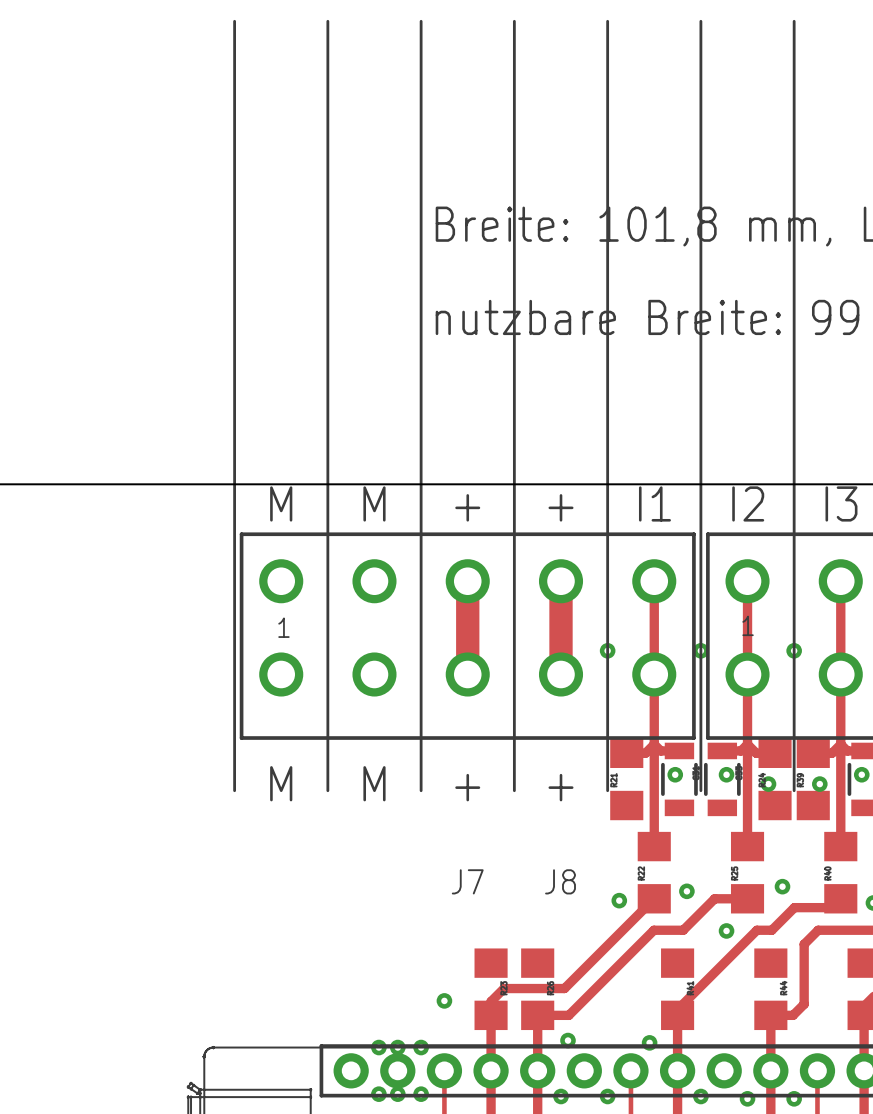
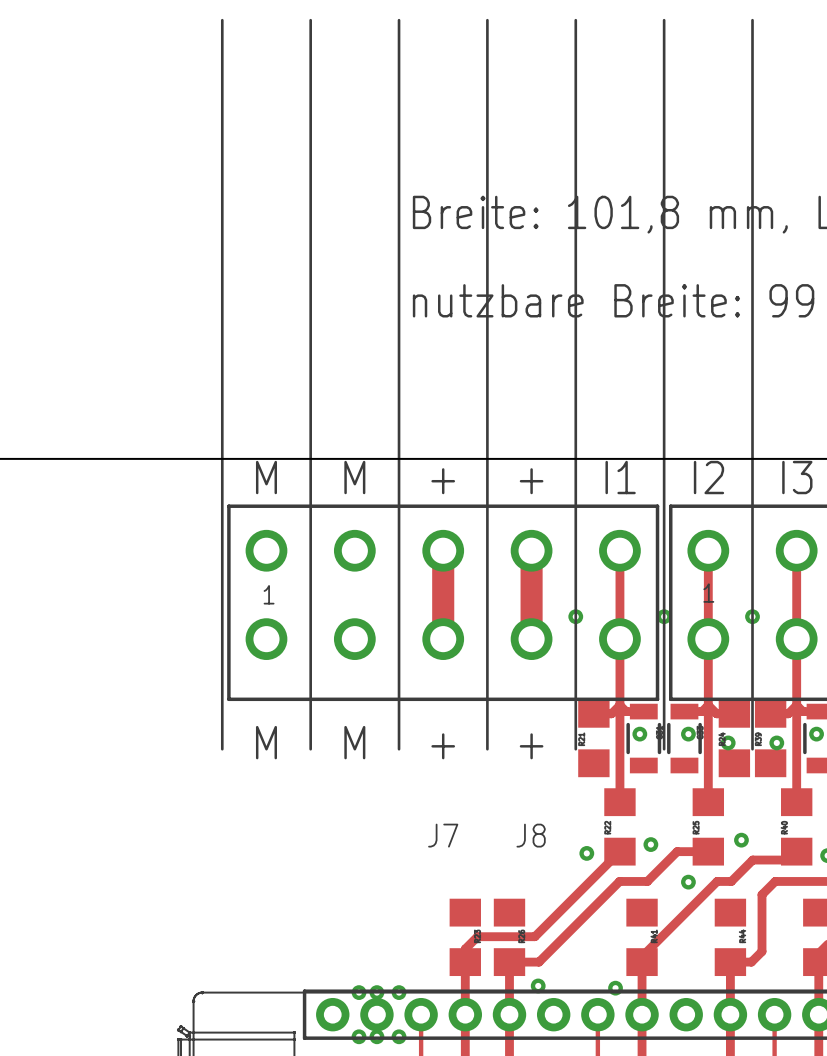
via: (444, 1000) -> none
via: (561, 1096) -> none
via: (607, 1096) -> none
via: (700, 1096) -> none
via: (747, 1098) -> none
via: (794, 1098) -> none

